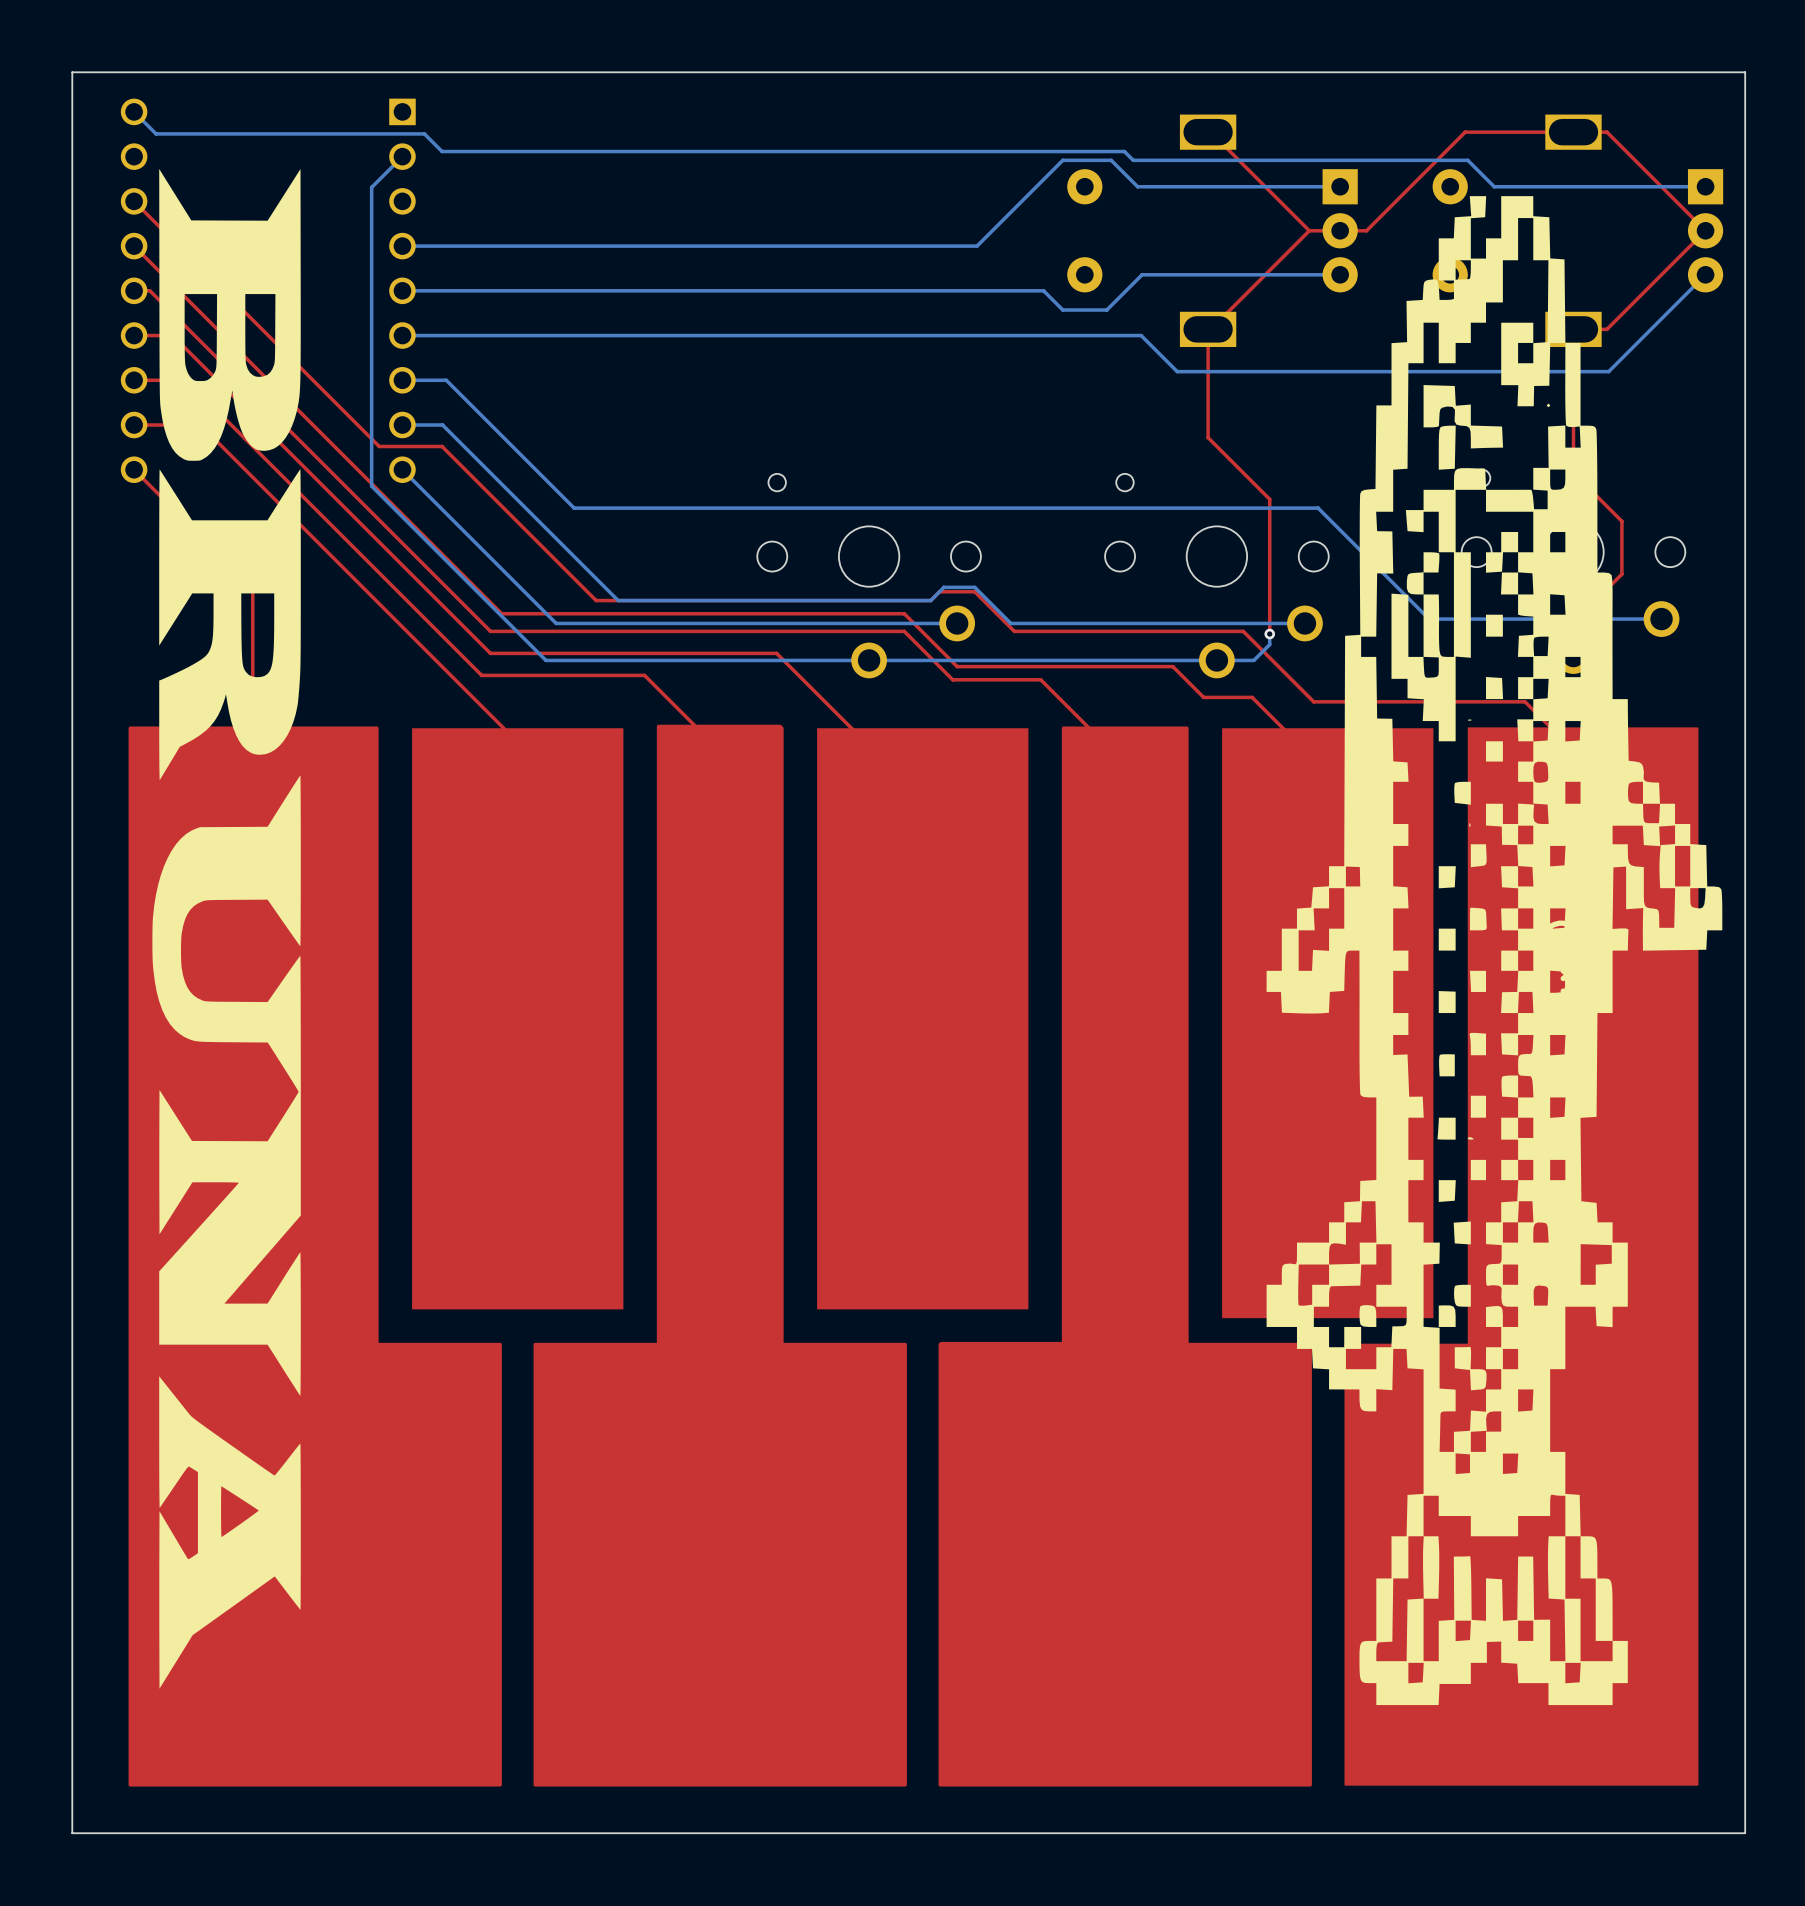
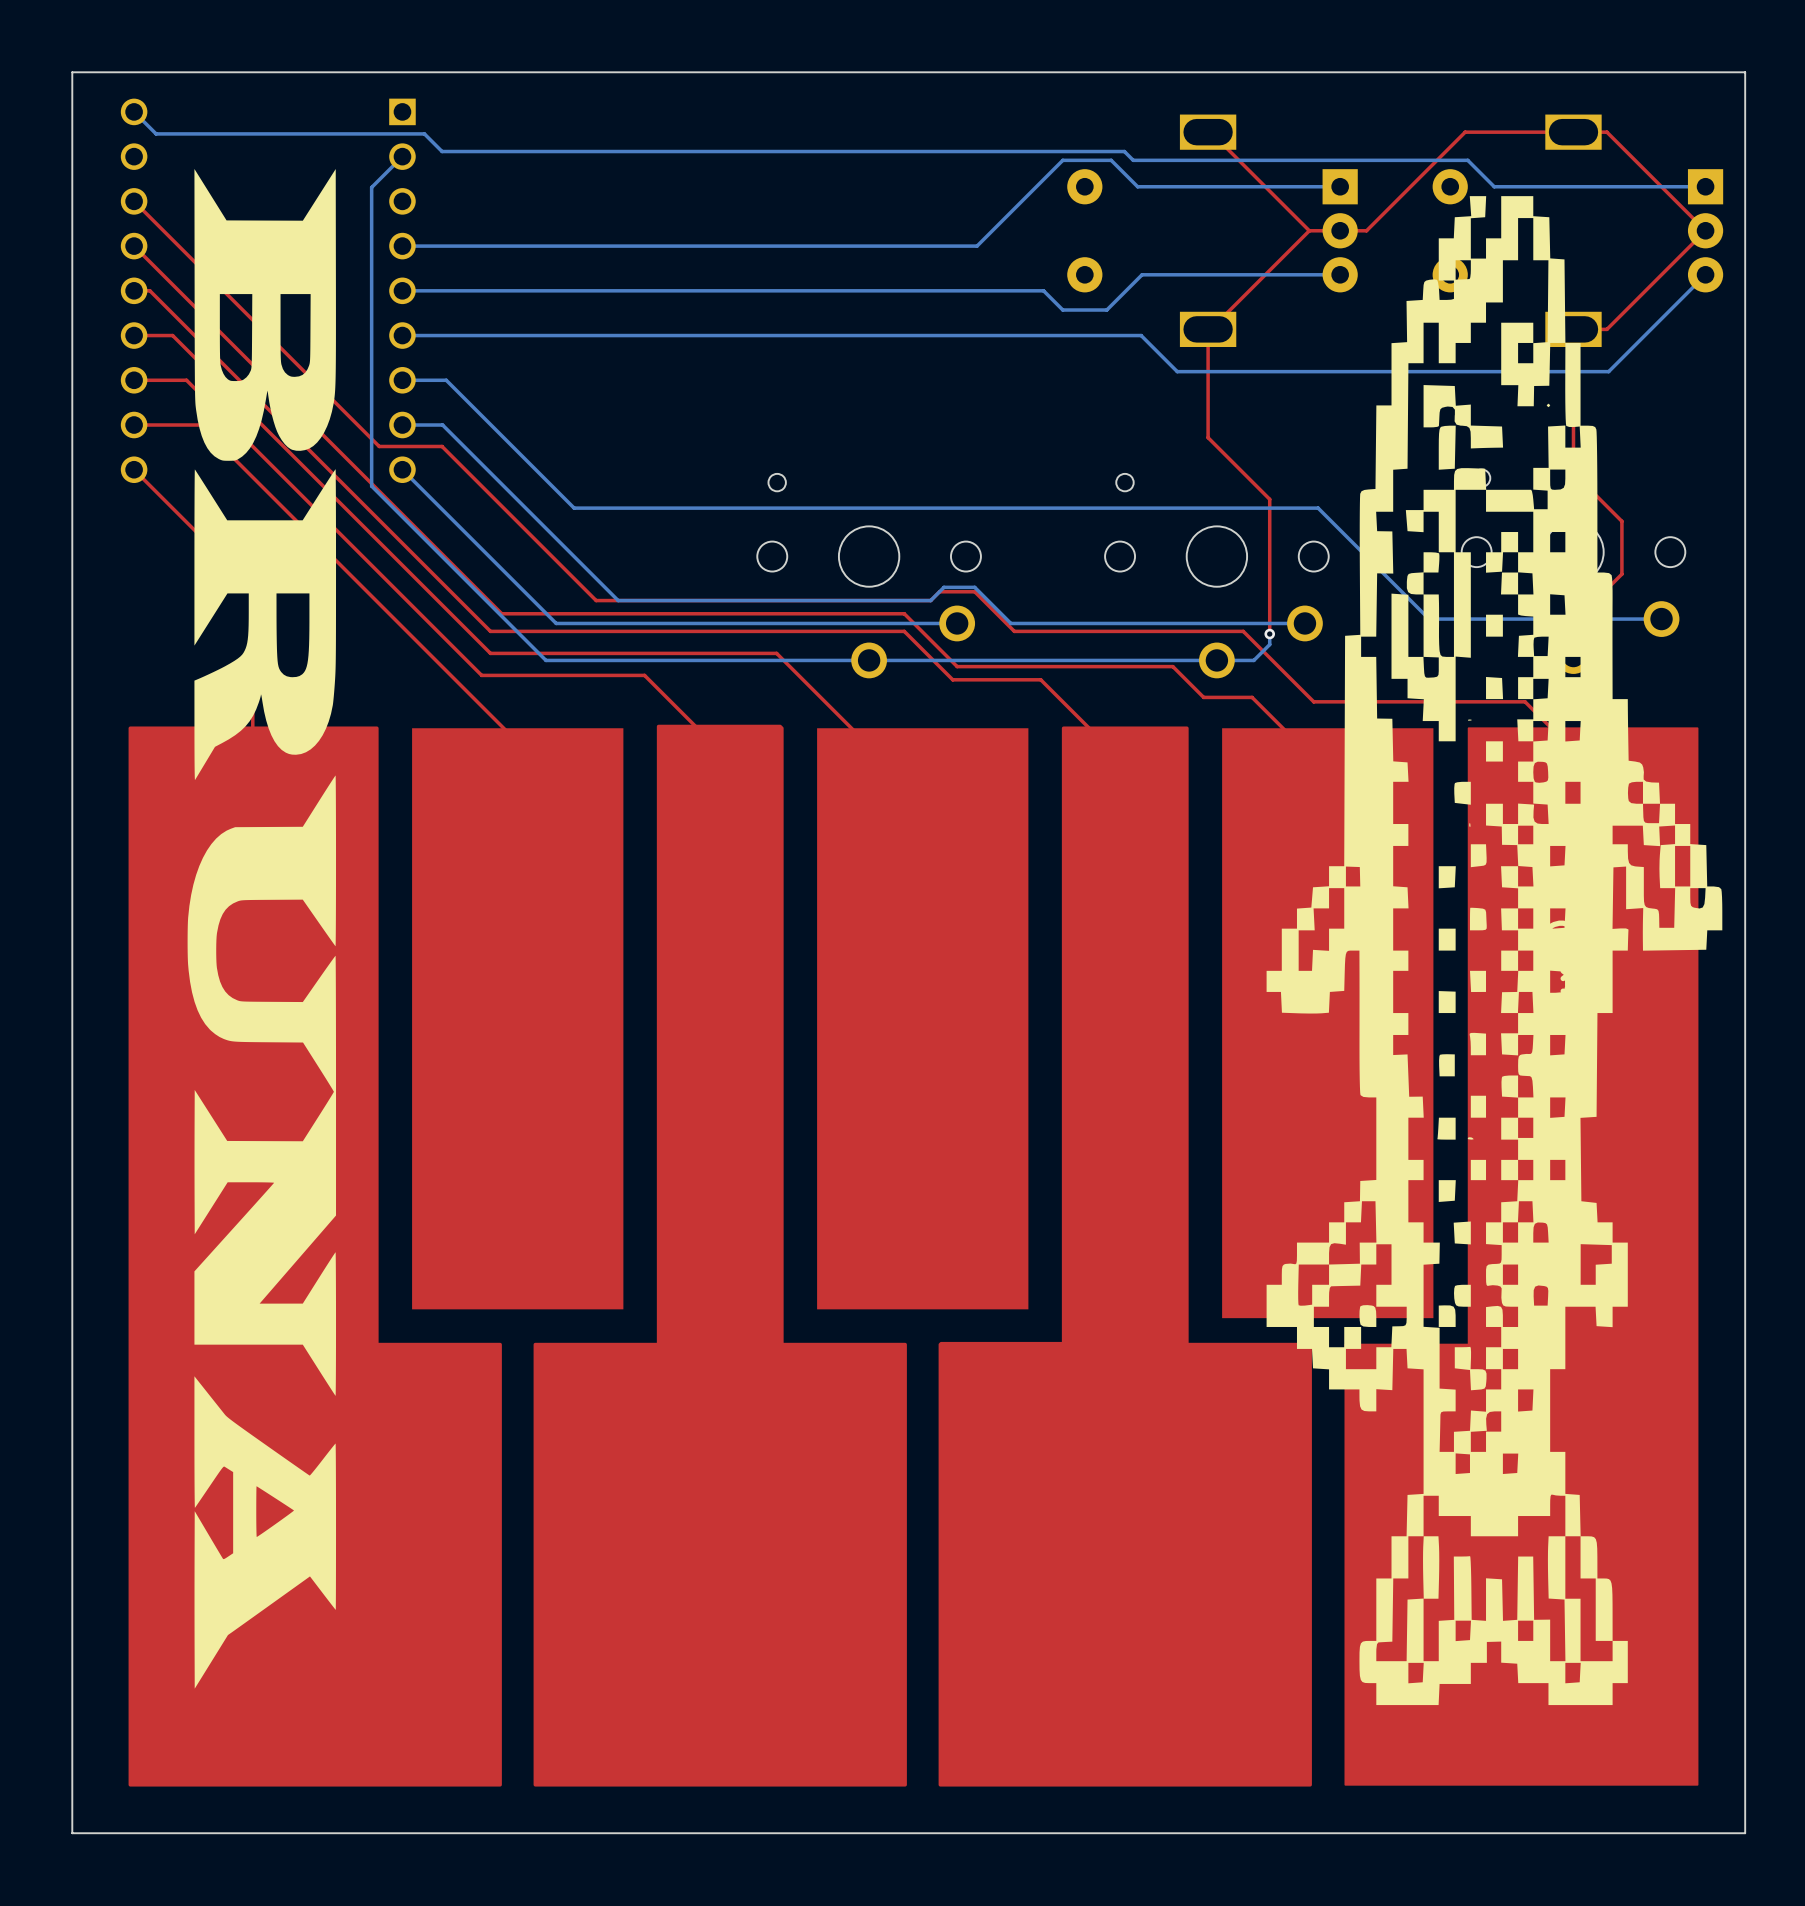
drawing position: (226, 928) -> (261, 928)

